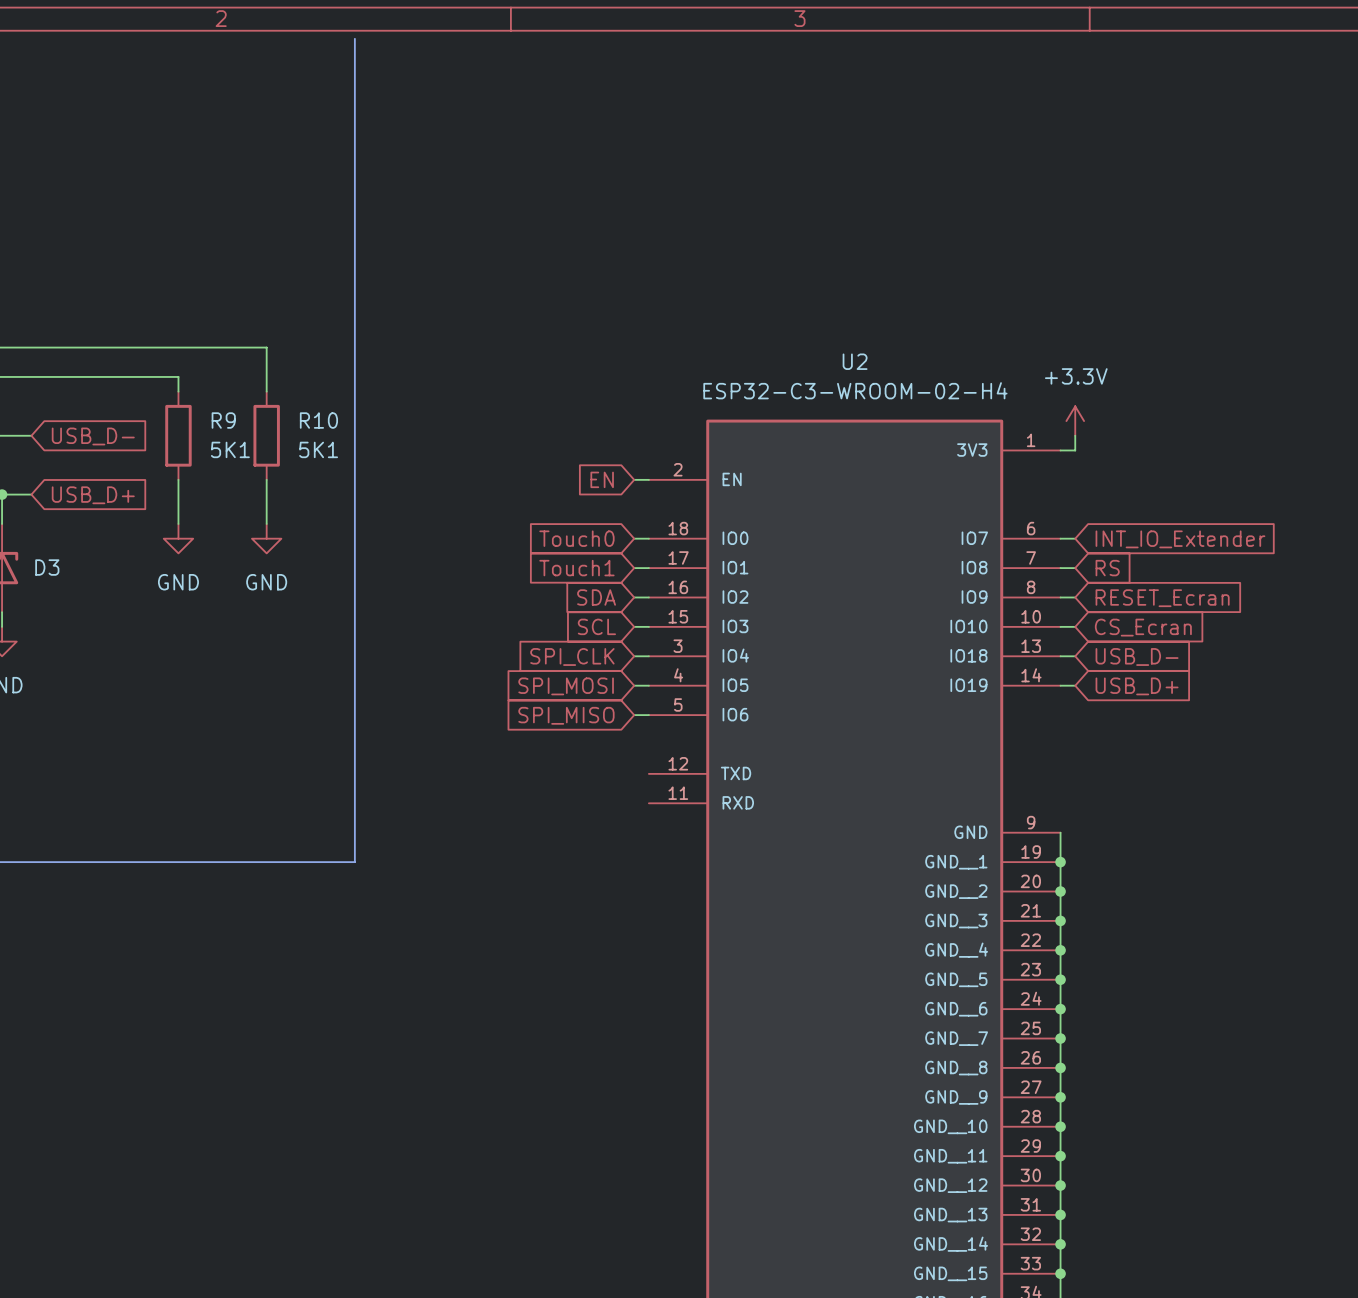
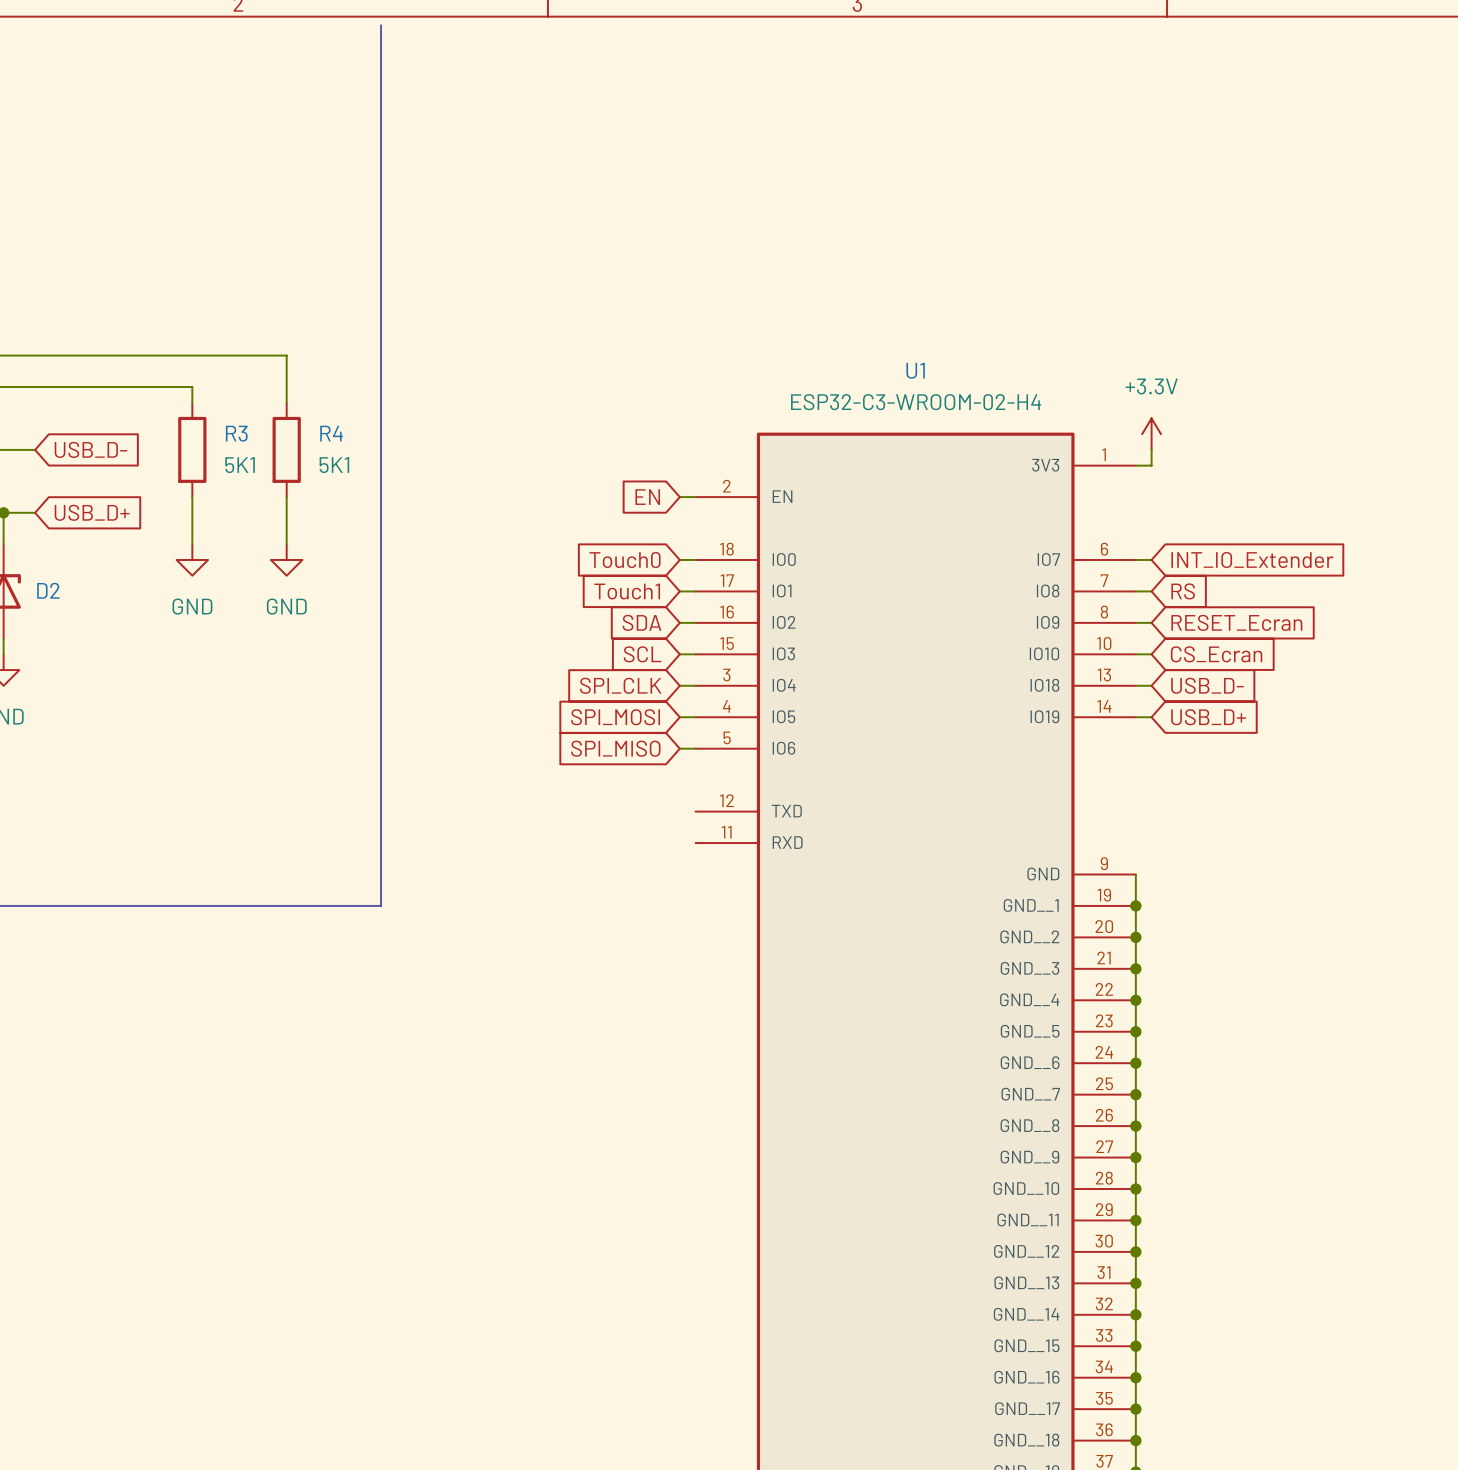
U2 name: U2 (855, 361) -> U1 (915, 370)
R9 name: R9 (223, 420) -> R3 (236, 433)
R10 name: R10 (318, 420) -> R4 (331, 433)
D3 name: D3 (47, 567) -> D2 (48, 590)

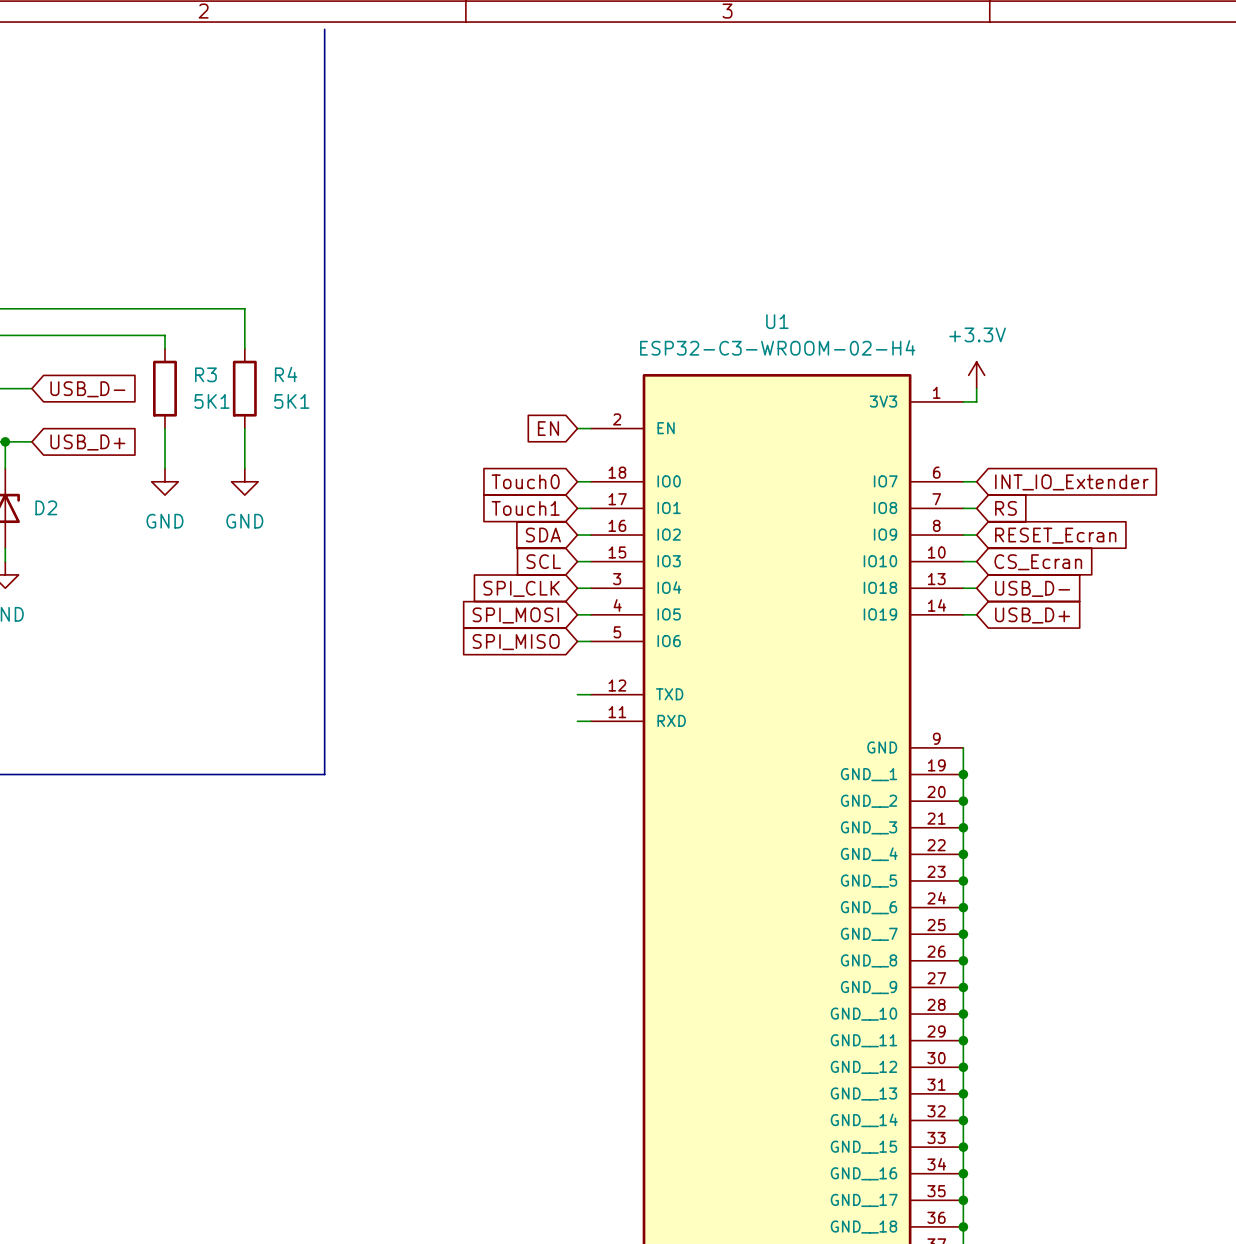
wire: none -> (577, 694) (590, 694)
wire: none -> (577, 721) (590, 721)

